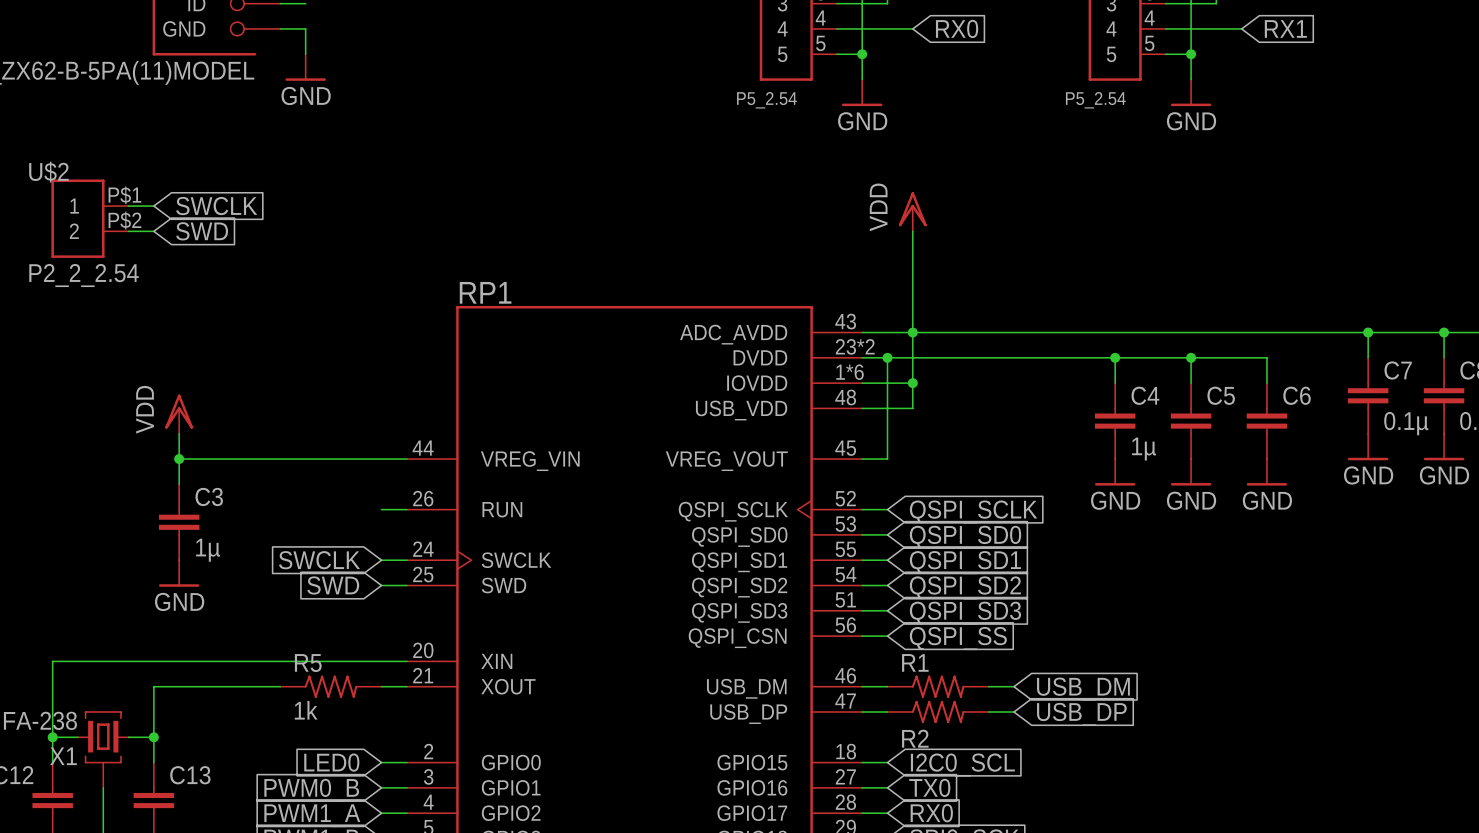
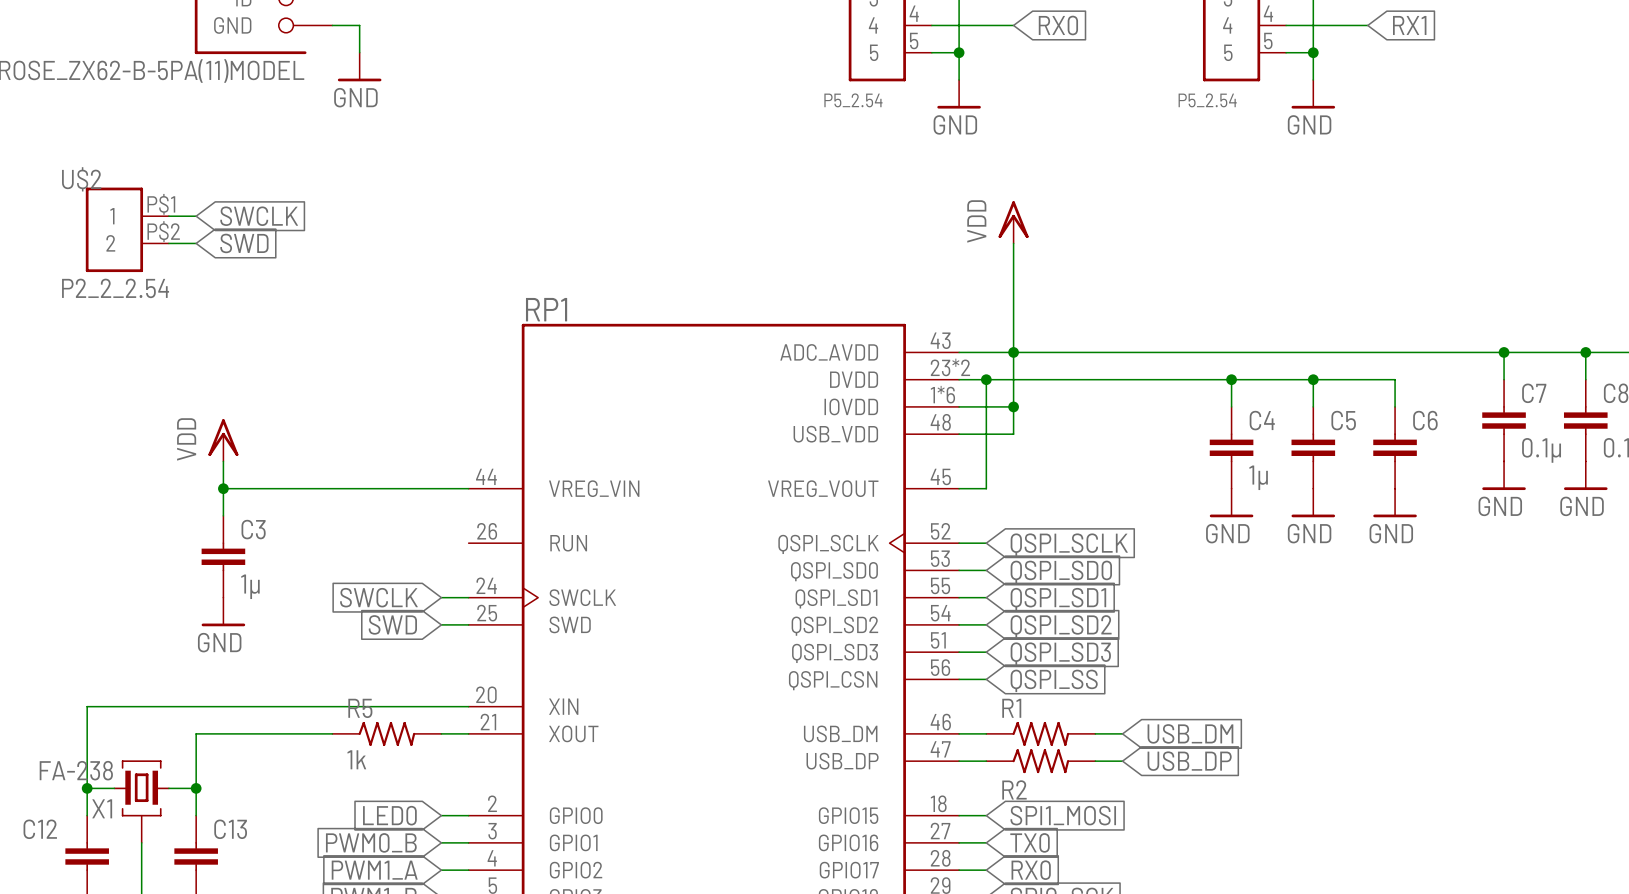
wire: (381, 509) (406, 509) -> none
global label: I2C0_SCL (962, 765) -> SPI1_MOSI (1063, 815)

